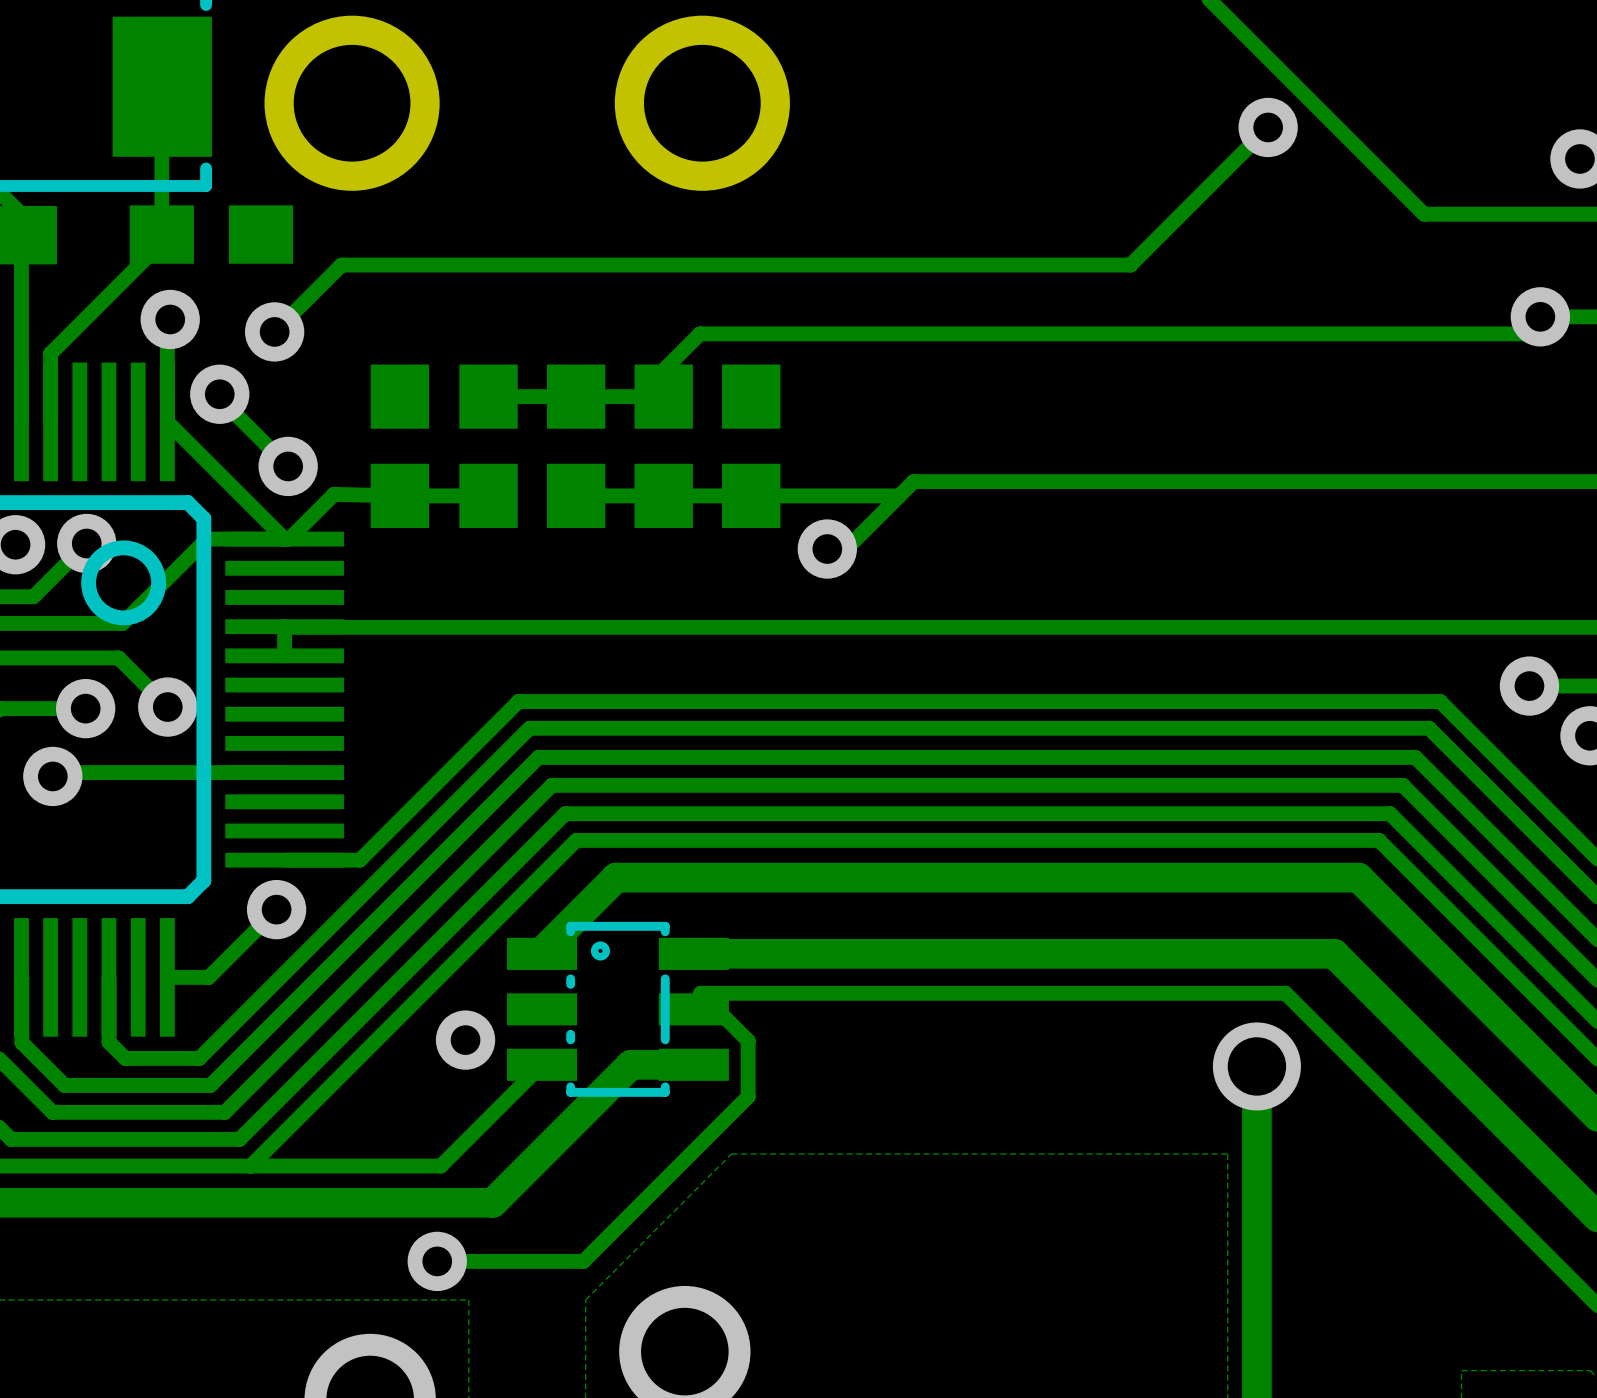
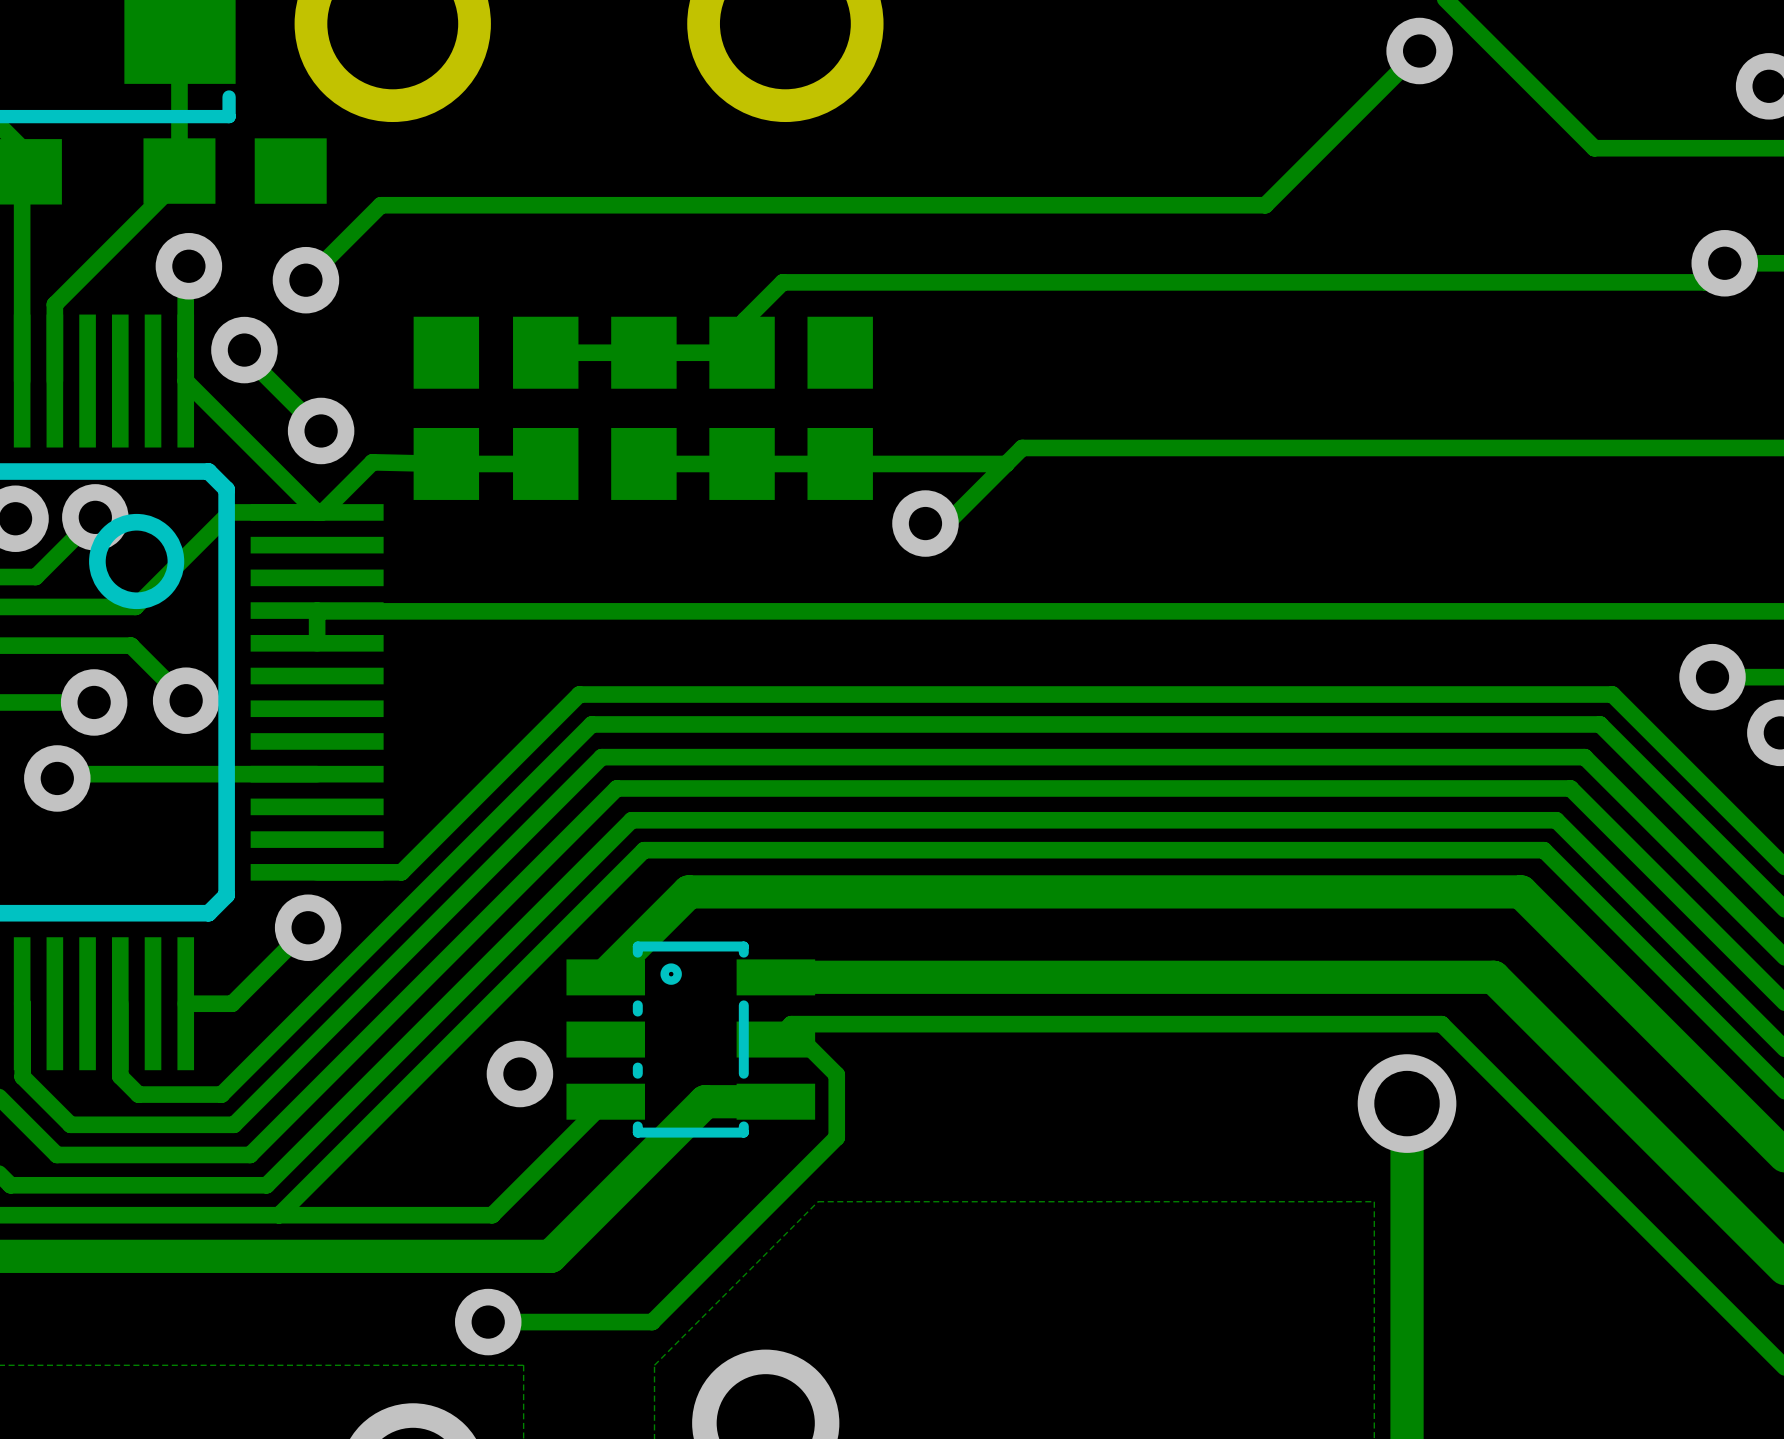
track: (1287, 995) (1285, 993) (700, 993) (716, 1009) -> (1441, 1024) (791, 1024) (778, 1036)

